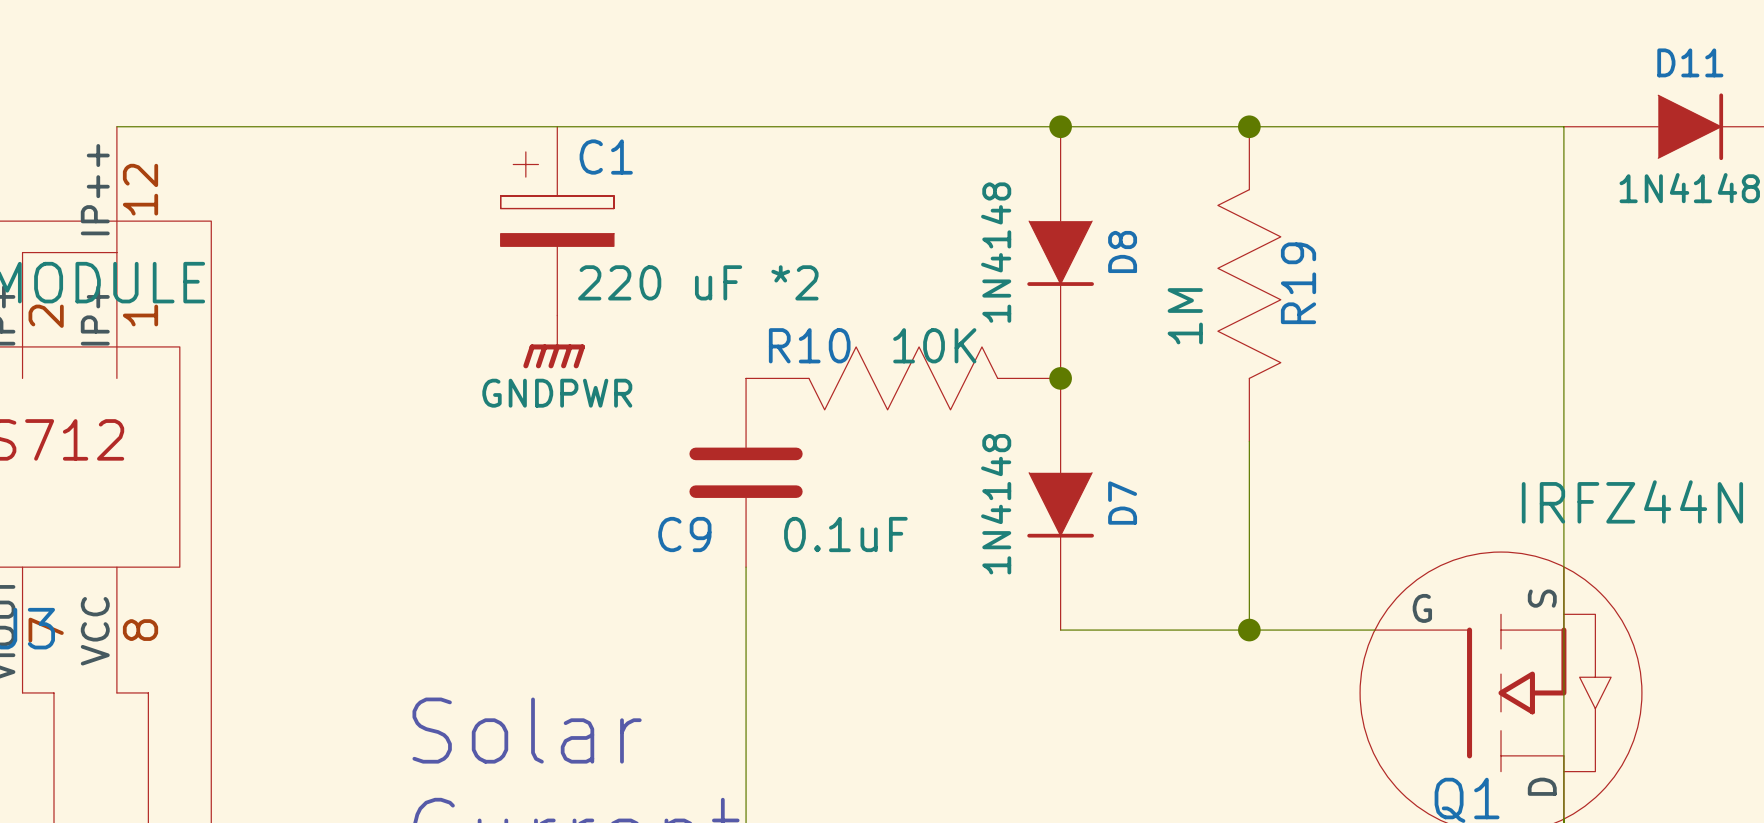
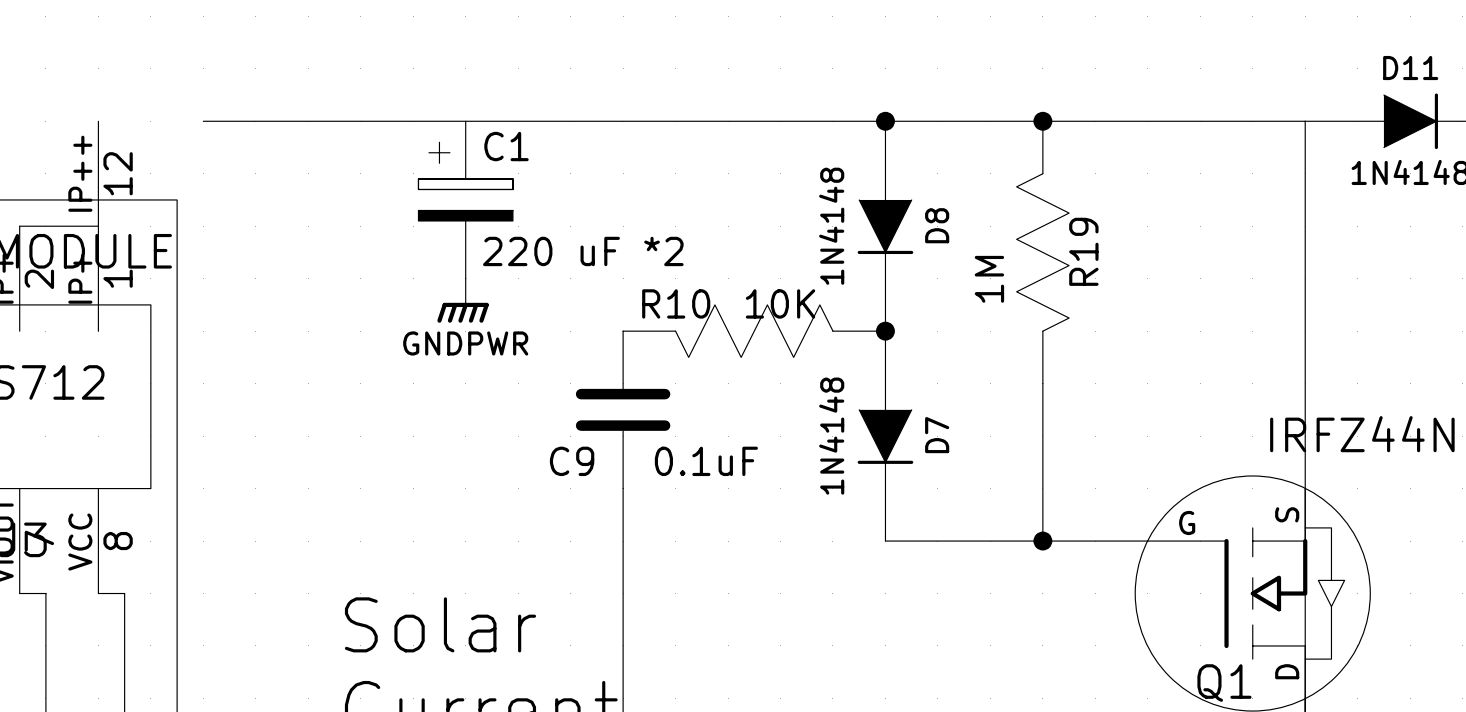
wire: (116, 126) (242, 126) -> none

